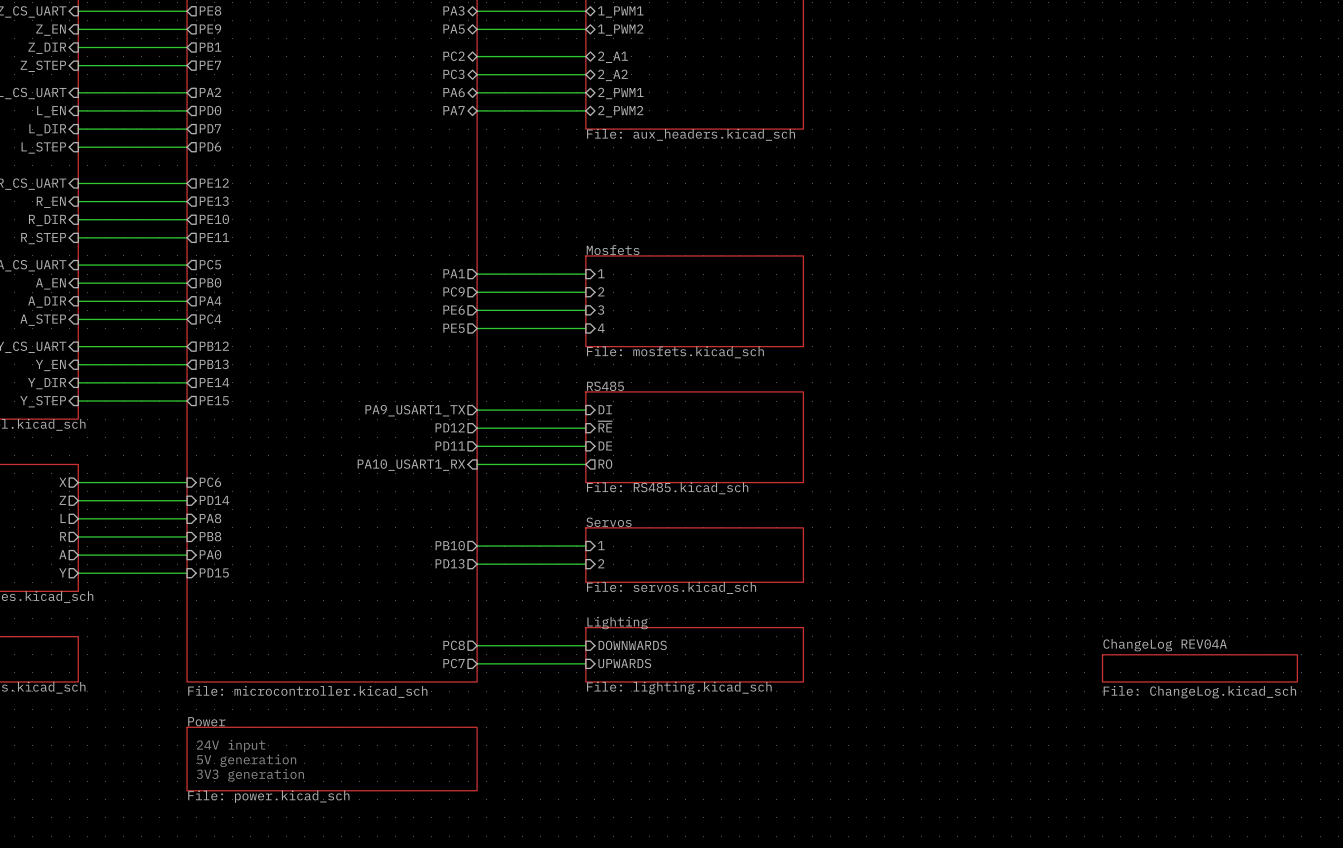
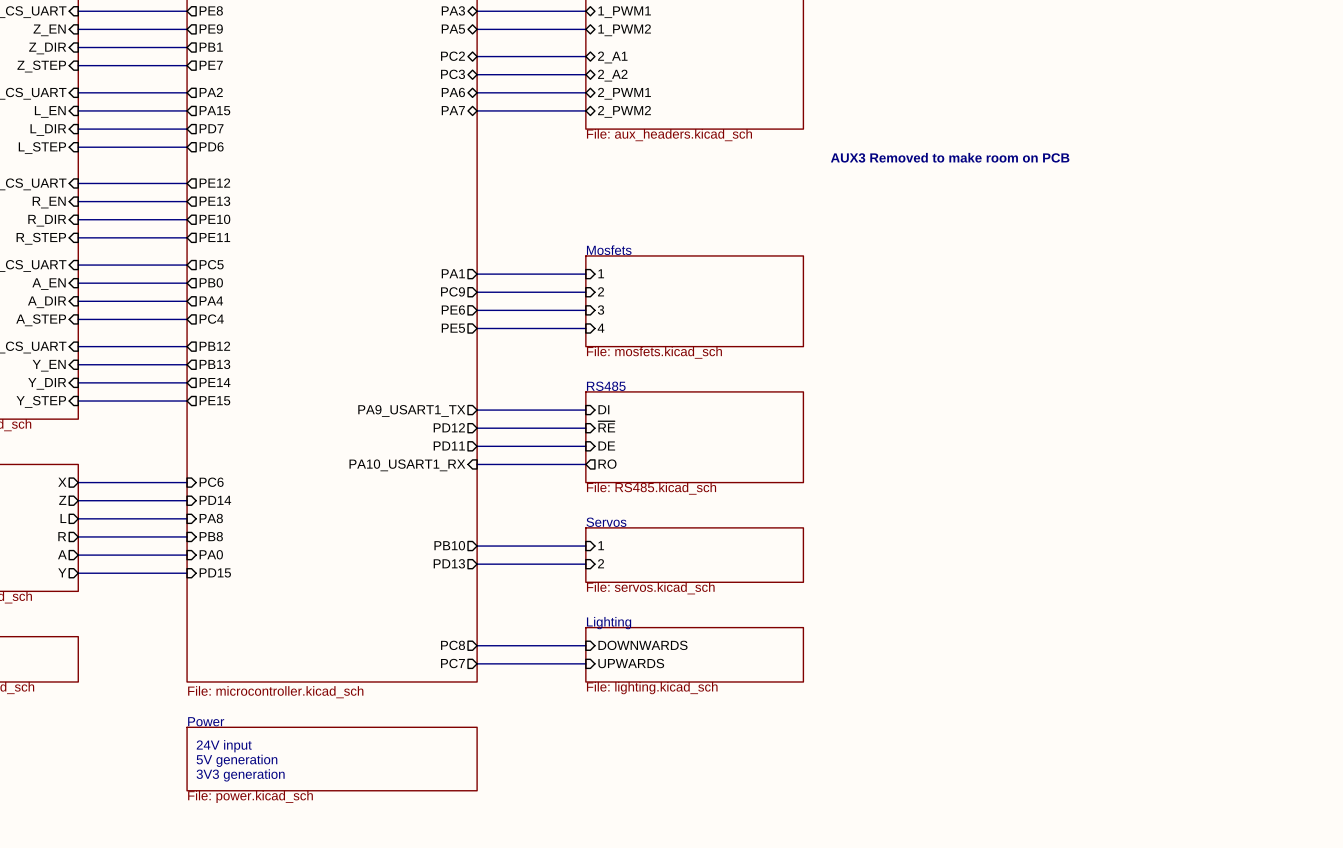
sheet pin: PD0 (210, 110) -> PA15 (214, 110)
text: none -> AUX3 Removed to make room on PCB (950, 157)
sheet ChangeLog REV04A: File: ChangeLog.kicad_sch (1199, 668) -> none

